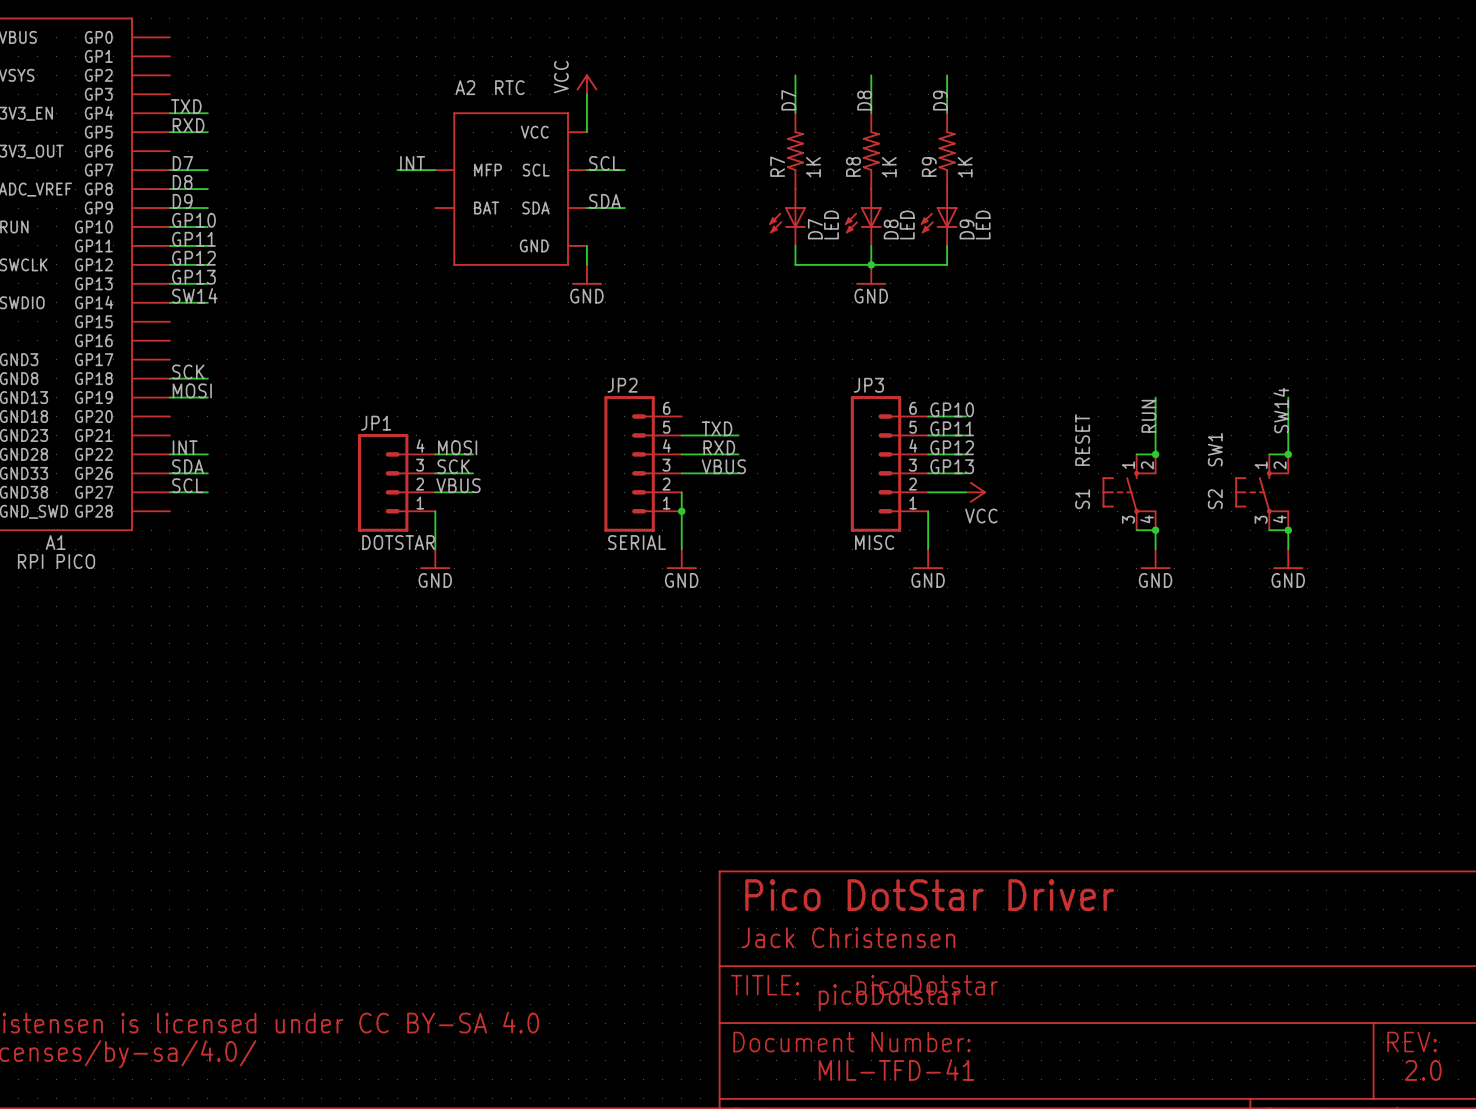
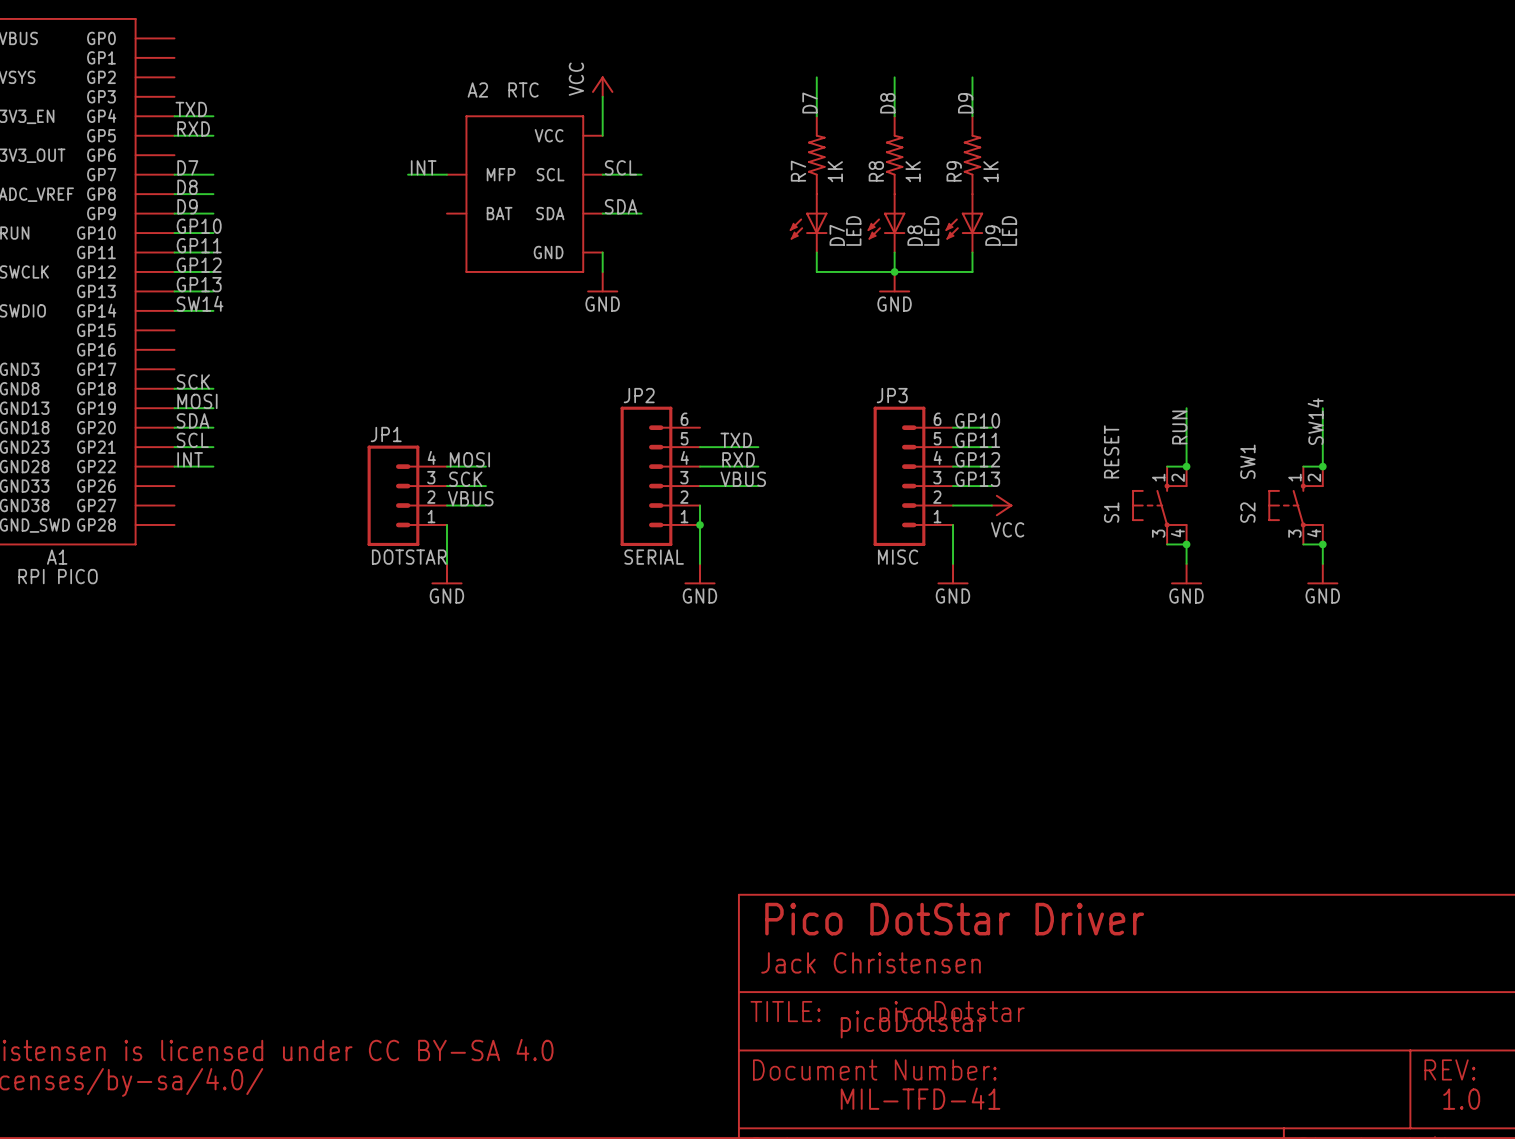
label position: SDA (188, 466) -> SDA (193, 420)
wire: (169, 473) (207, 473) -> (174, 447) (213, 447)
label position: SCL (187, 485) -> SCL (192, 440)
wire: (169, 492) (207, 492) -> (174, 427) (213, 427)
text: 2.0 (1423, 1070) -> 1.0 (1461, 1099)

